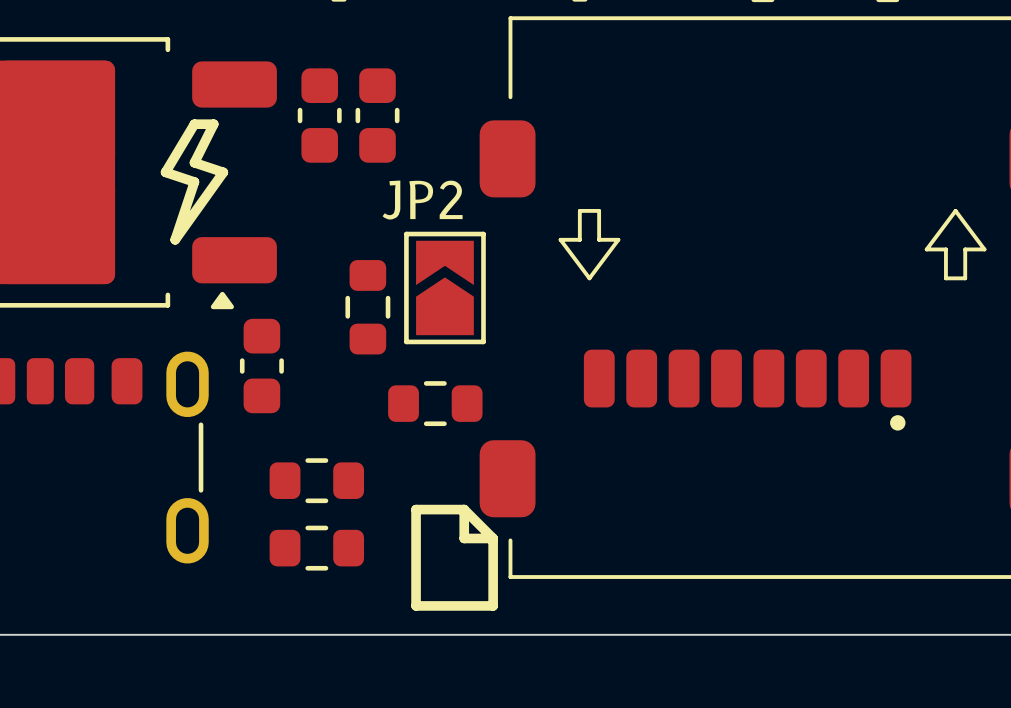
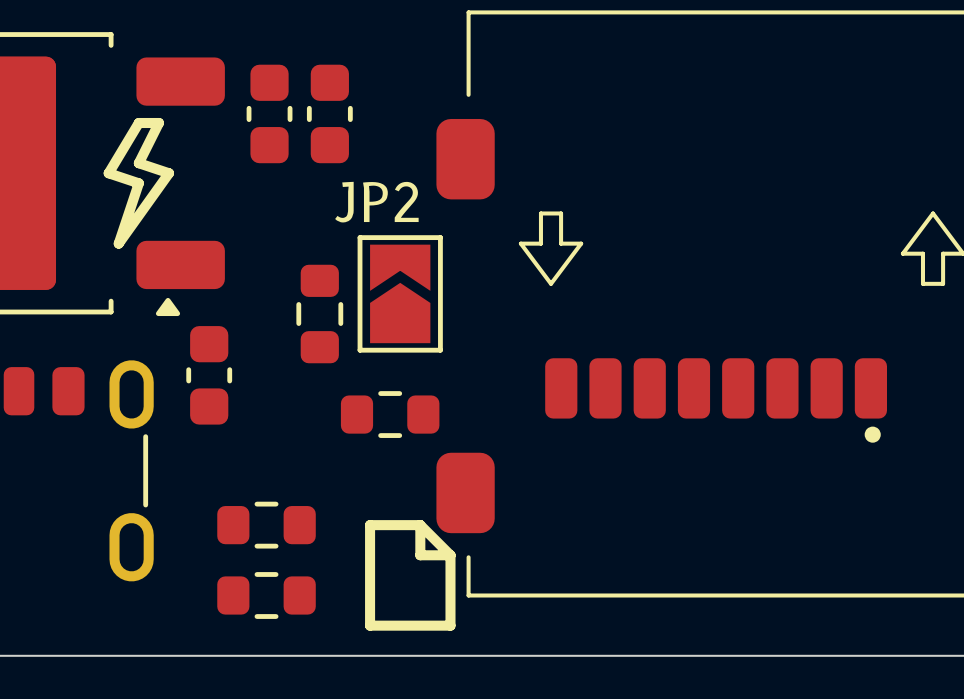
part: (316, 480) -> none
part: none -> (266, 525)
part: (316, 548) -> none
part: none -> (266, 595)

